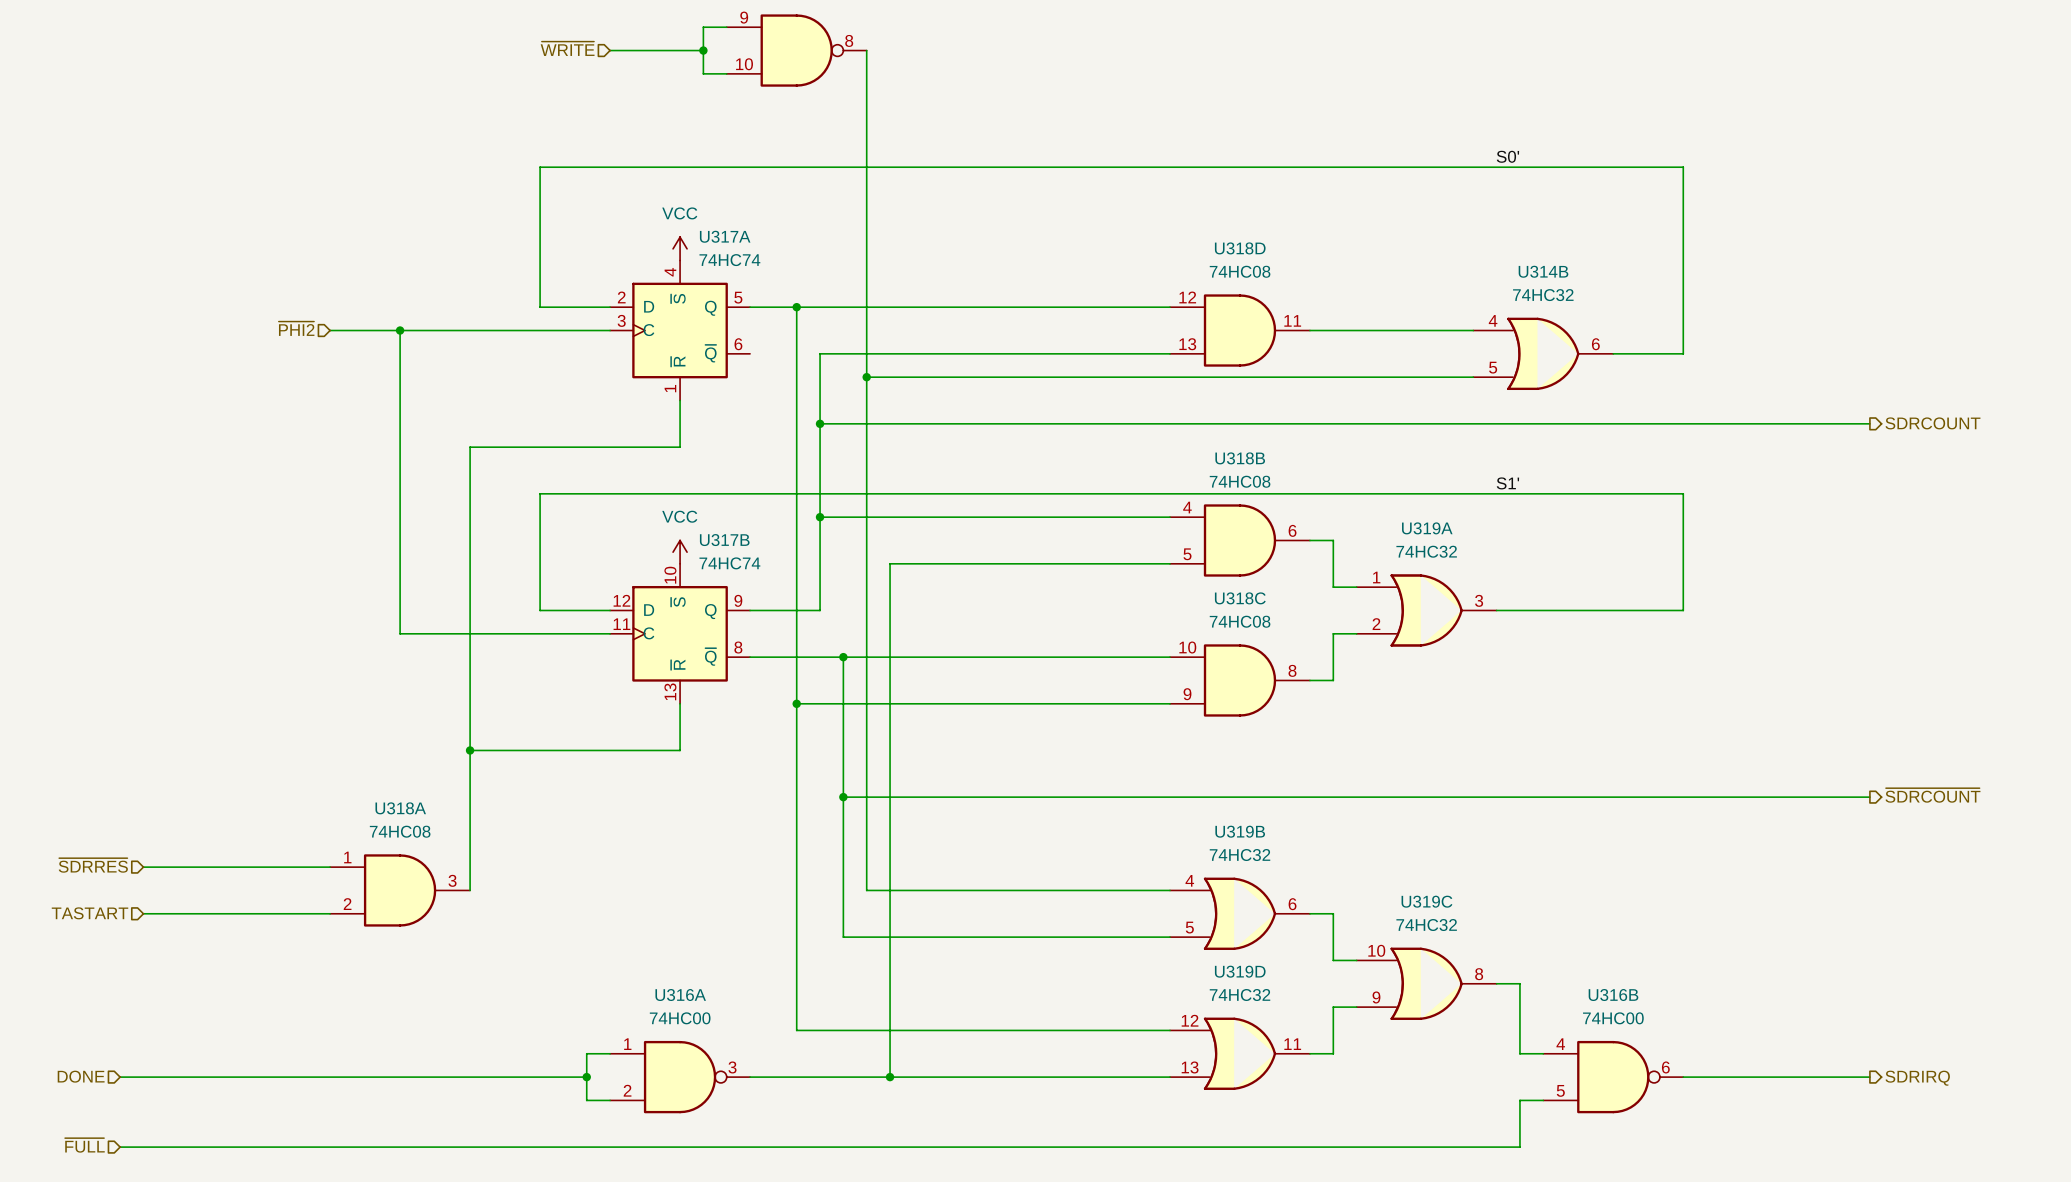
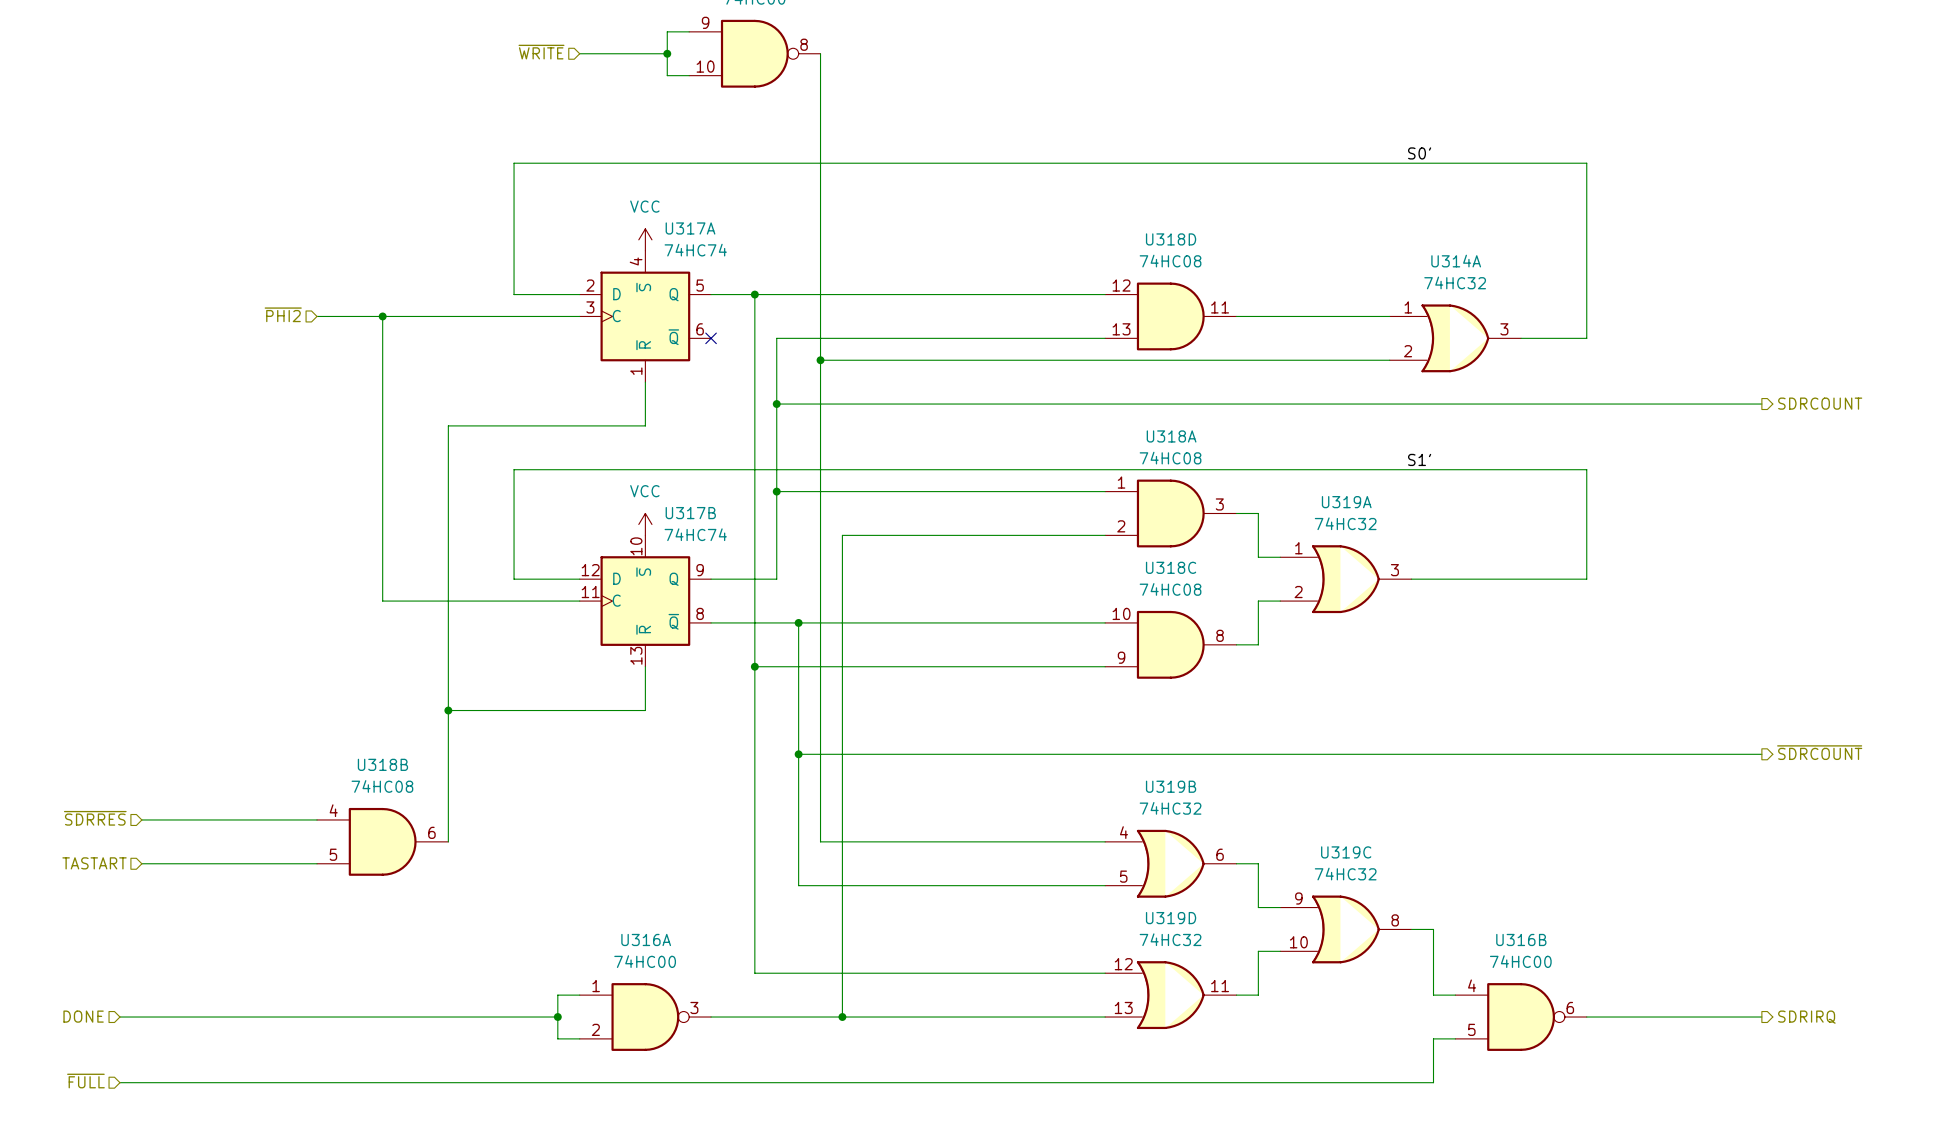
U314B name: U314B (1543, 271) -> U314A (1456, 261)
U314B pin number: 4 (1493, 320) -> 1 (1408, 307)
U314B pin number: 6 (1595, 344) -> 3 (1504, 329)
no-connect mark: none -> (711, 338)
U314B pin number: 5 (1493, 367) -> 2 (1408, 351)
U318B position: (1239, 540) -> (382, 841)
U318A position: (400, 890) -> (1170, 513)
U319C flip: as is (1426, 983) -> up-down (1345, 929)

